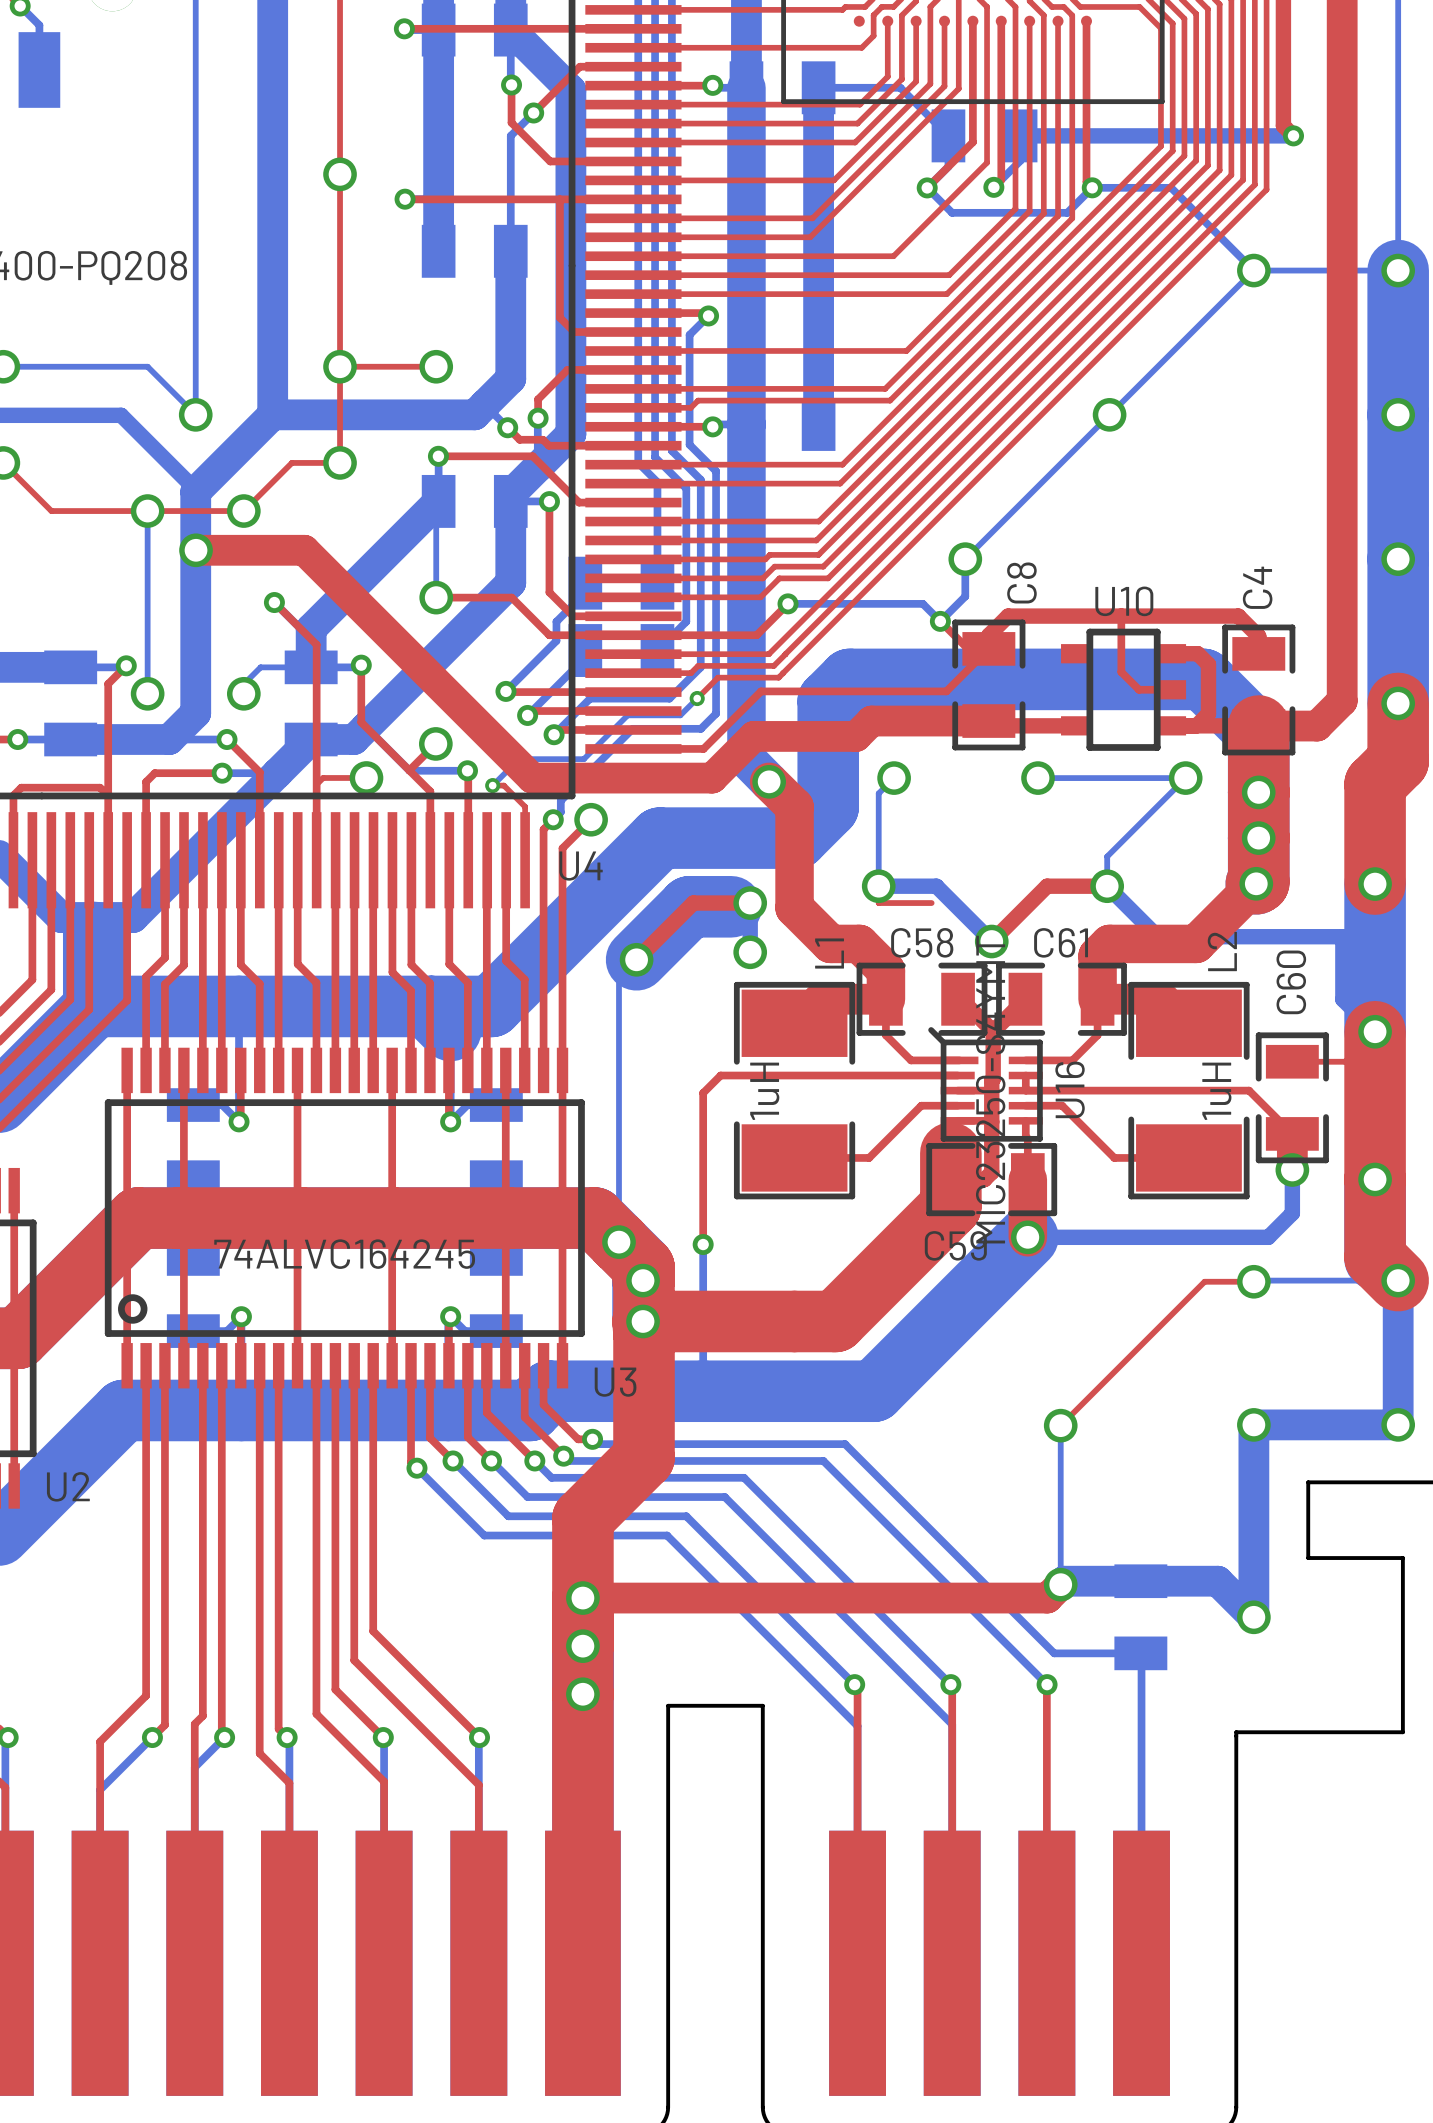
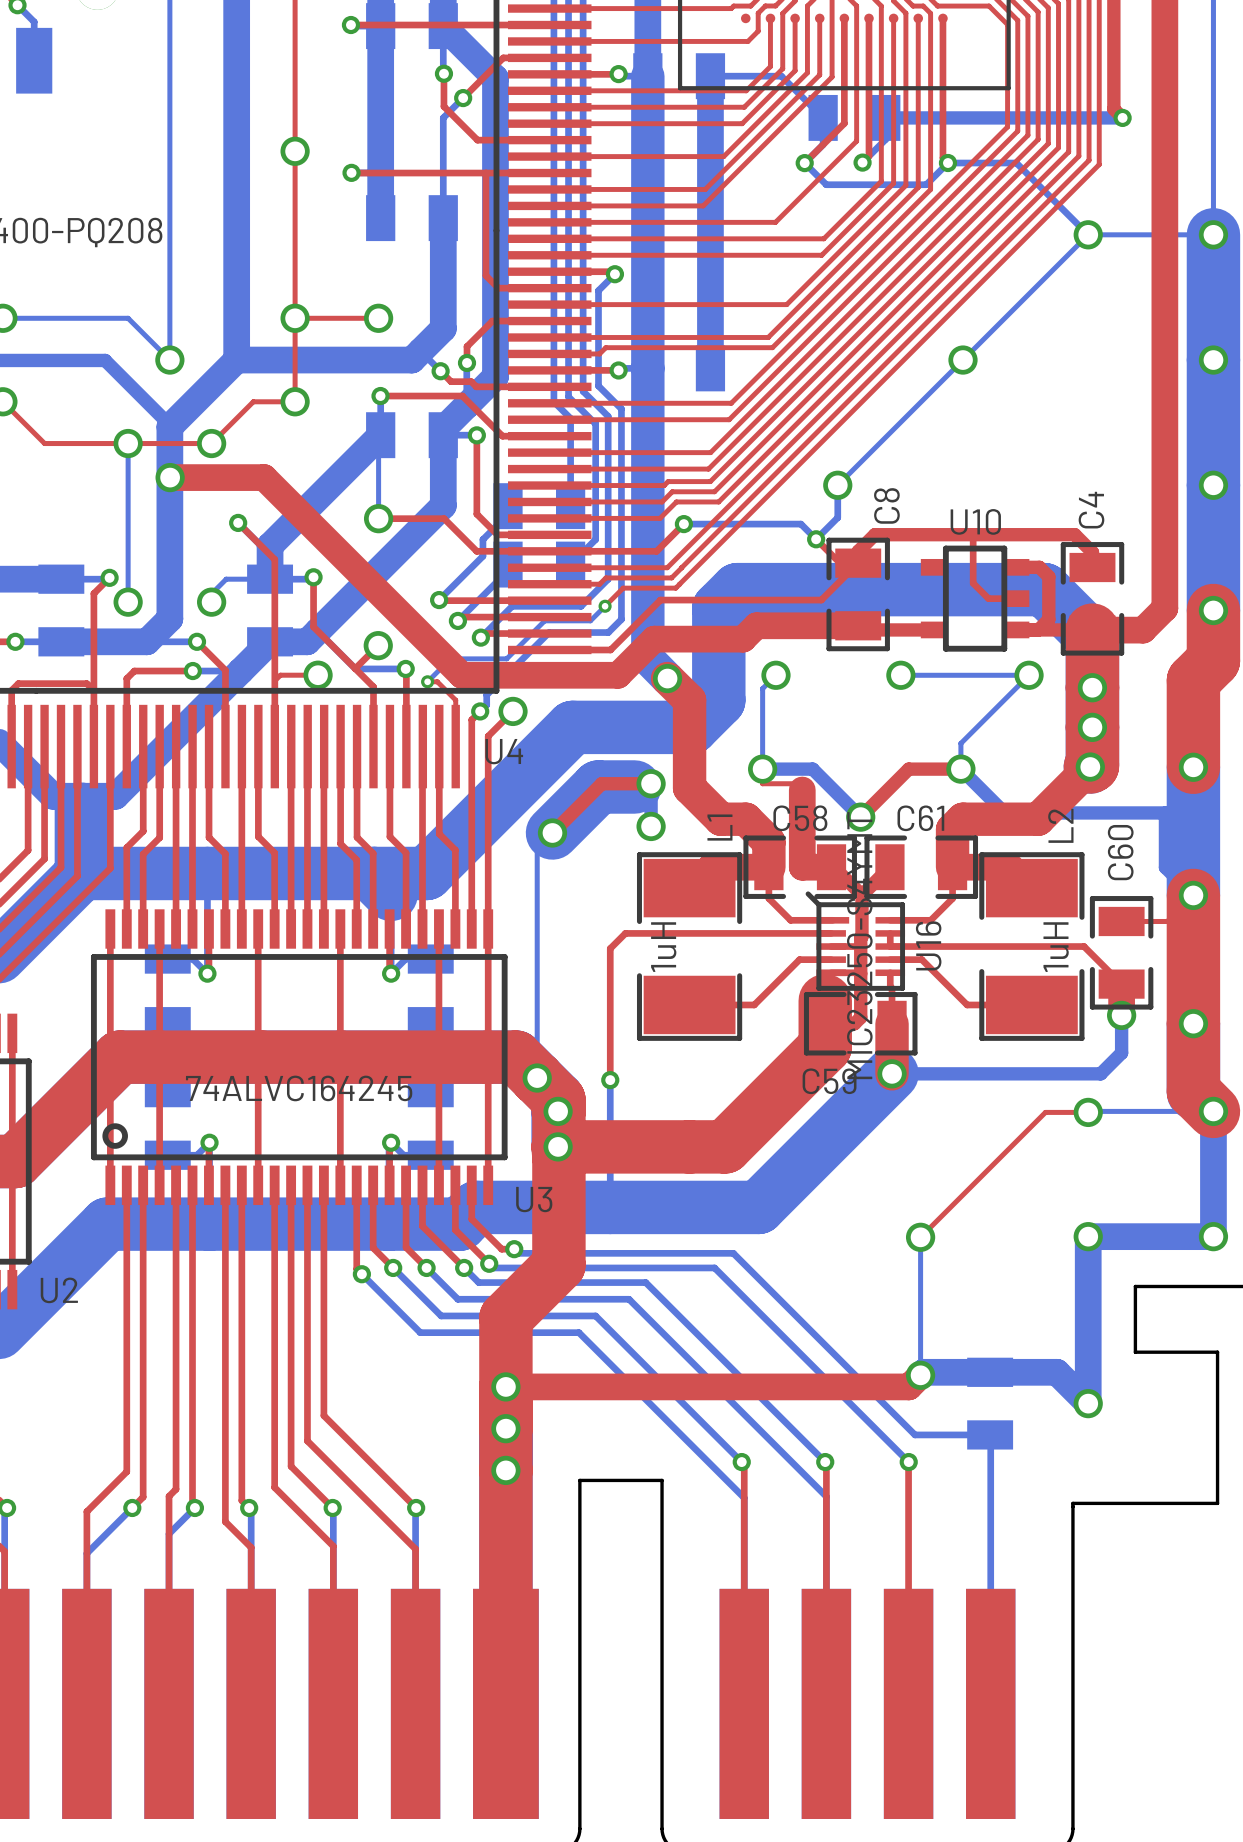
top track: none -> (802, 789) (802, 867) (831, 867)

